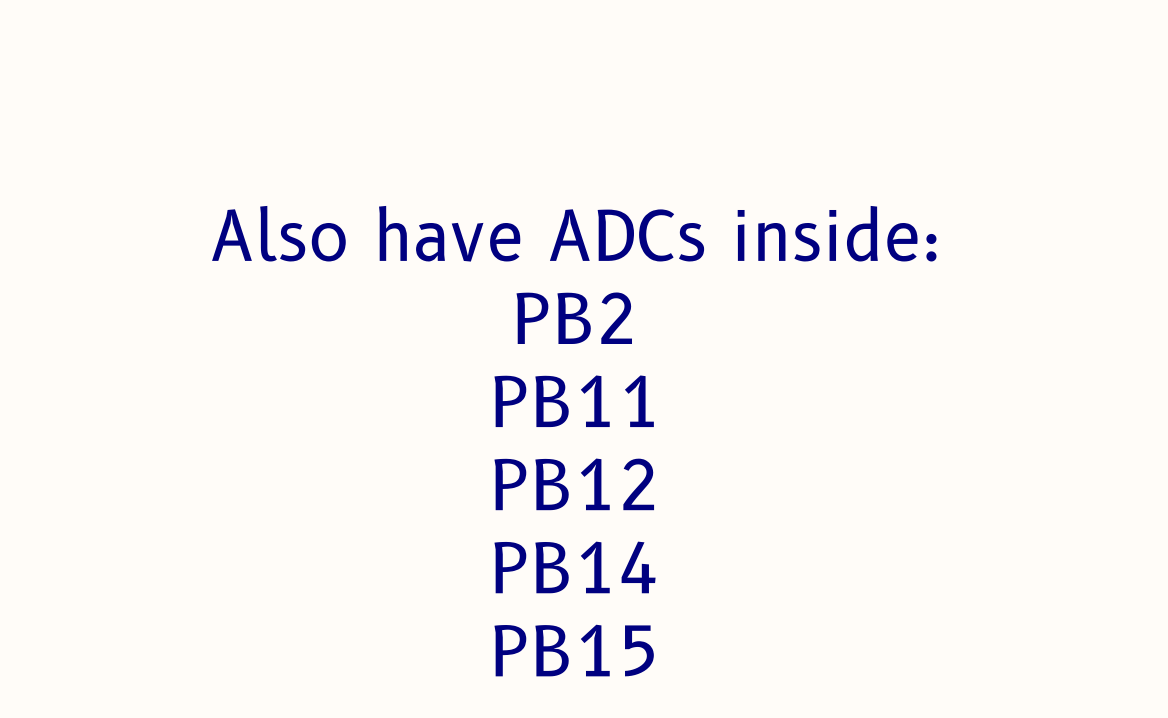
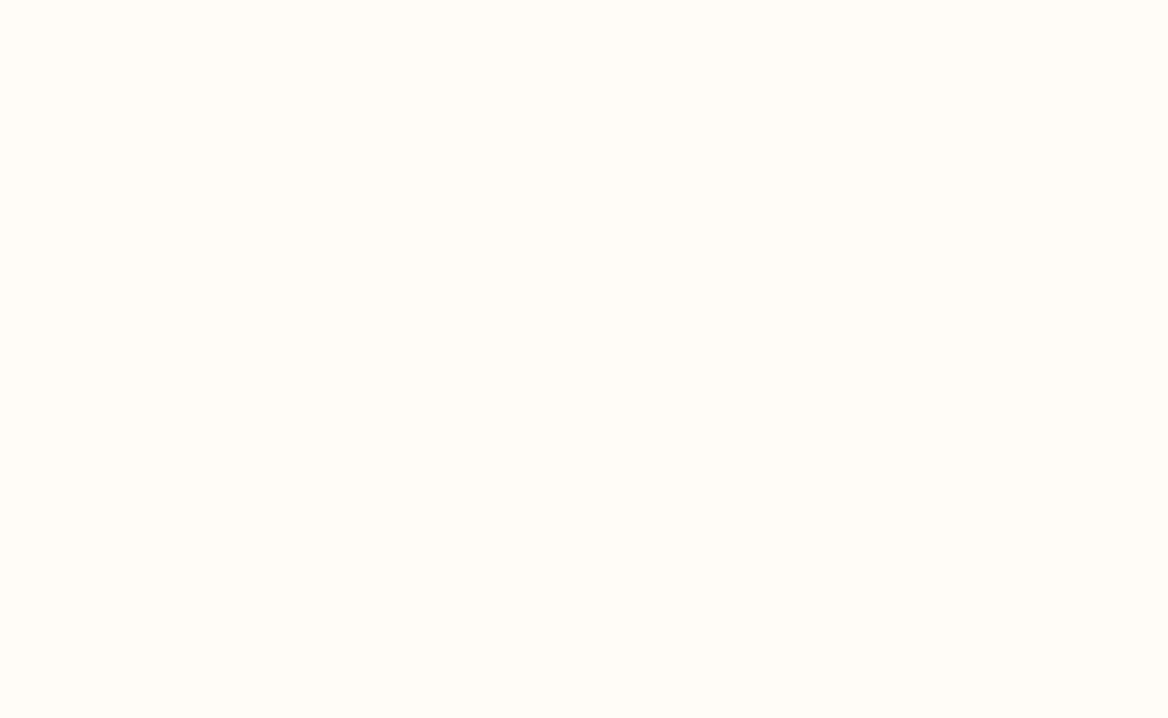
text: Also have ADCs inside: (574, 233) -> none
text: PB2 (574, 318) -> none
text: PB11 (574, 401) -> none
text: PB12 (574, 484) -> none
text: PB14 (575, 567) -> none
text: PB15 (574, 650) -> none

